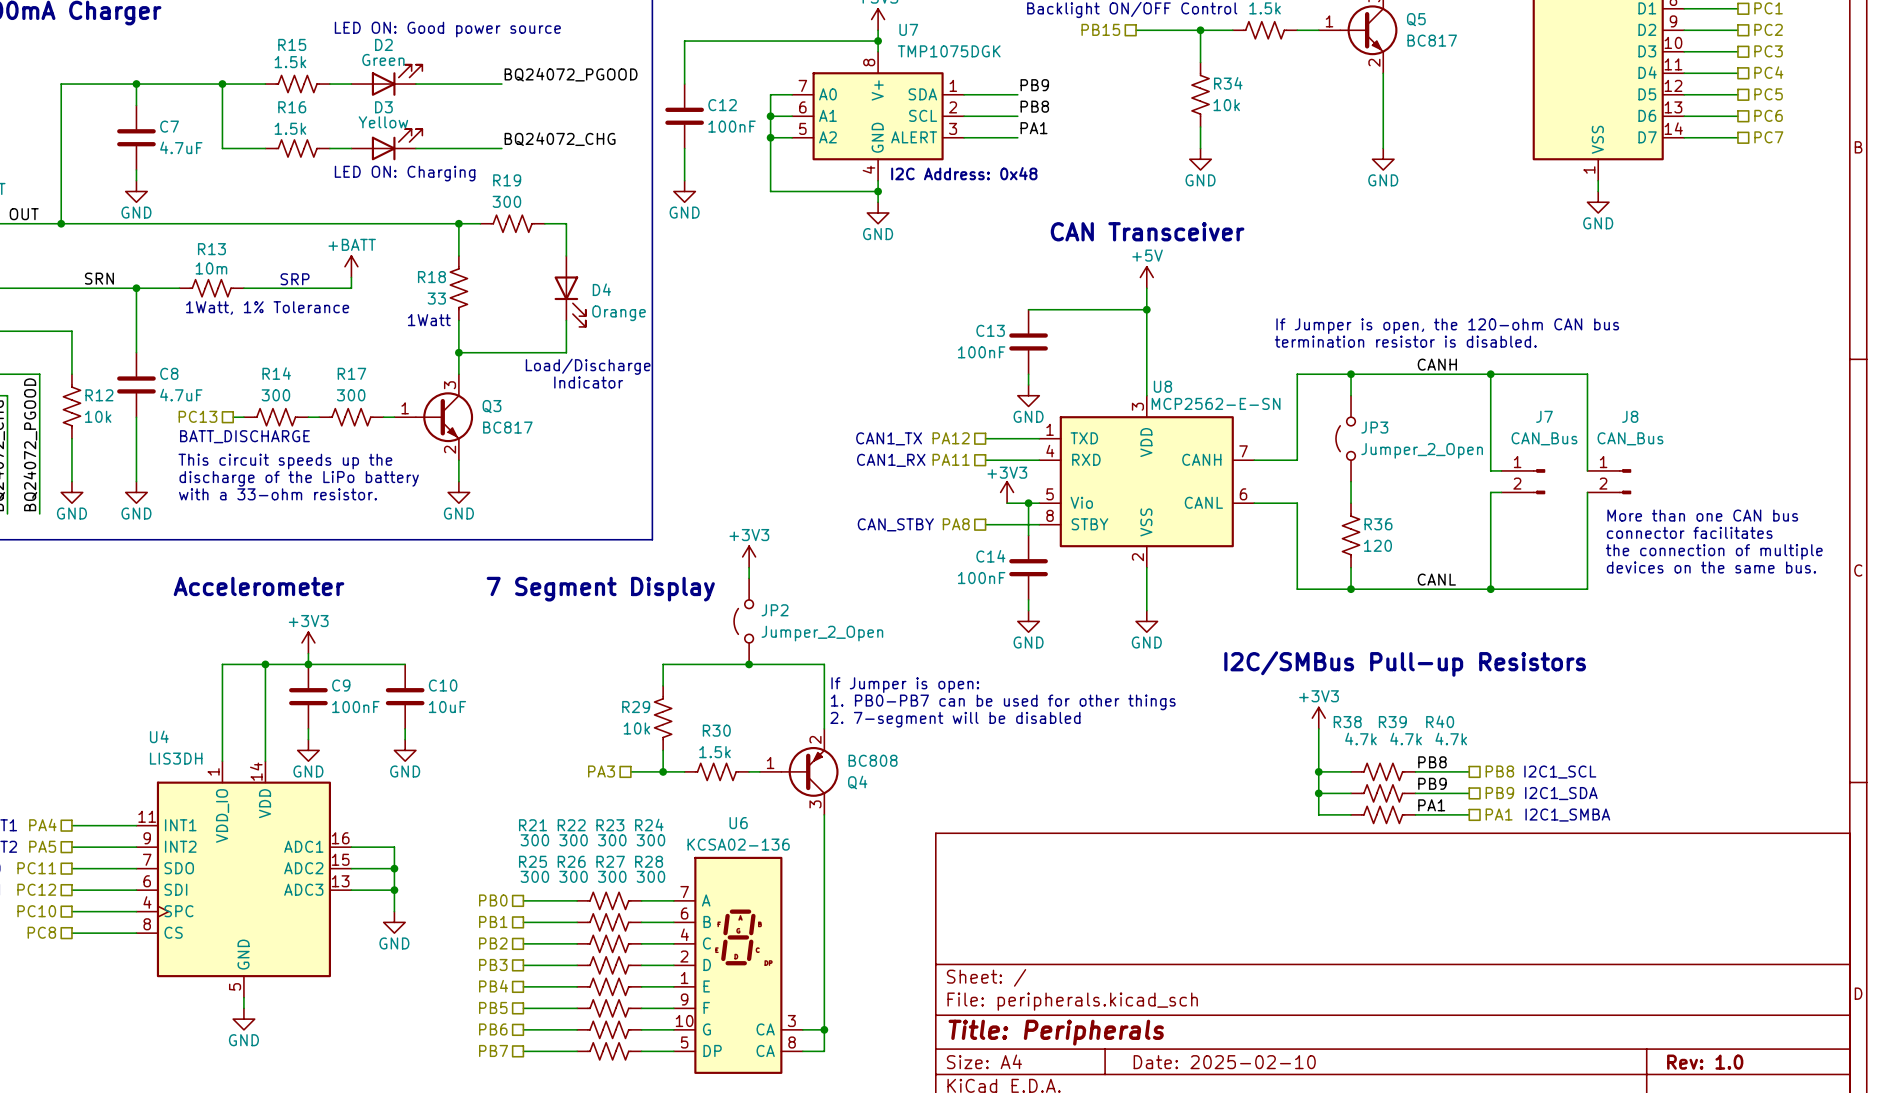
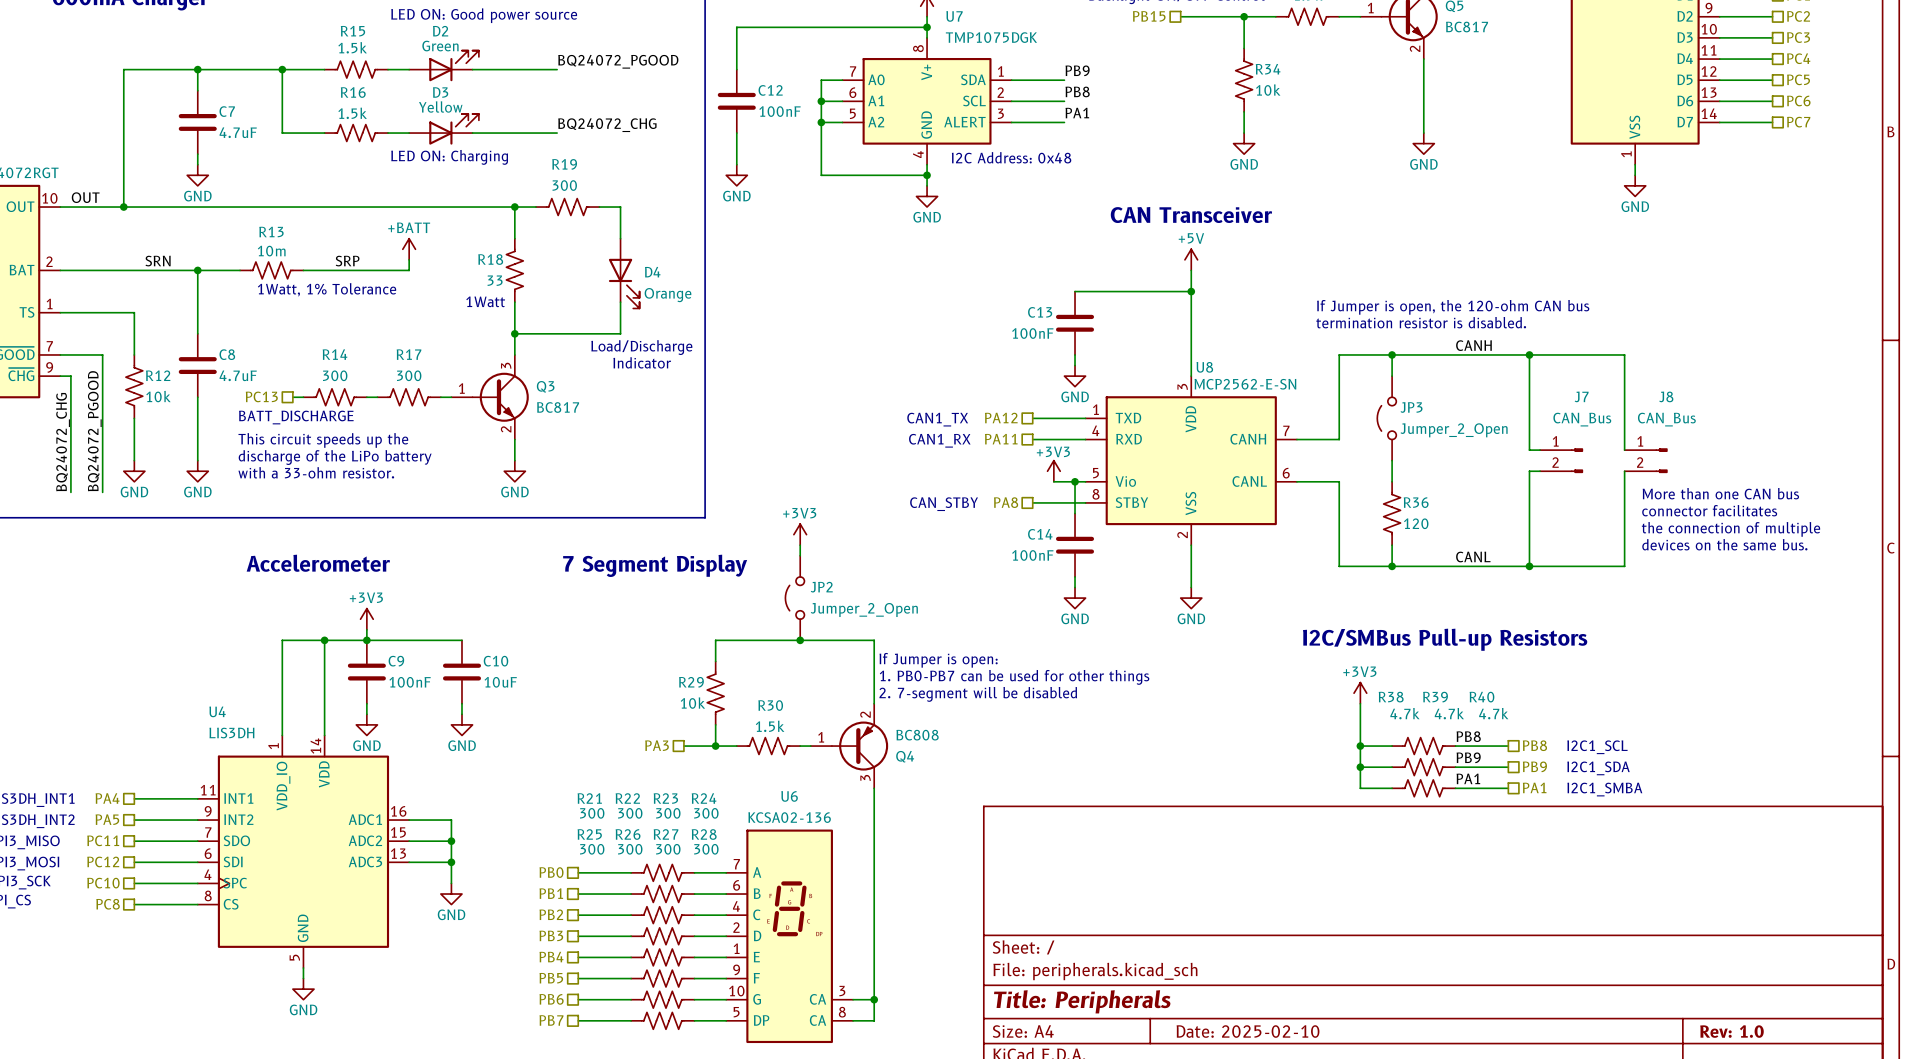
label: none -> SRP (347, 261)
text: SRP (295, 279) -> none

